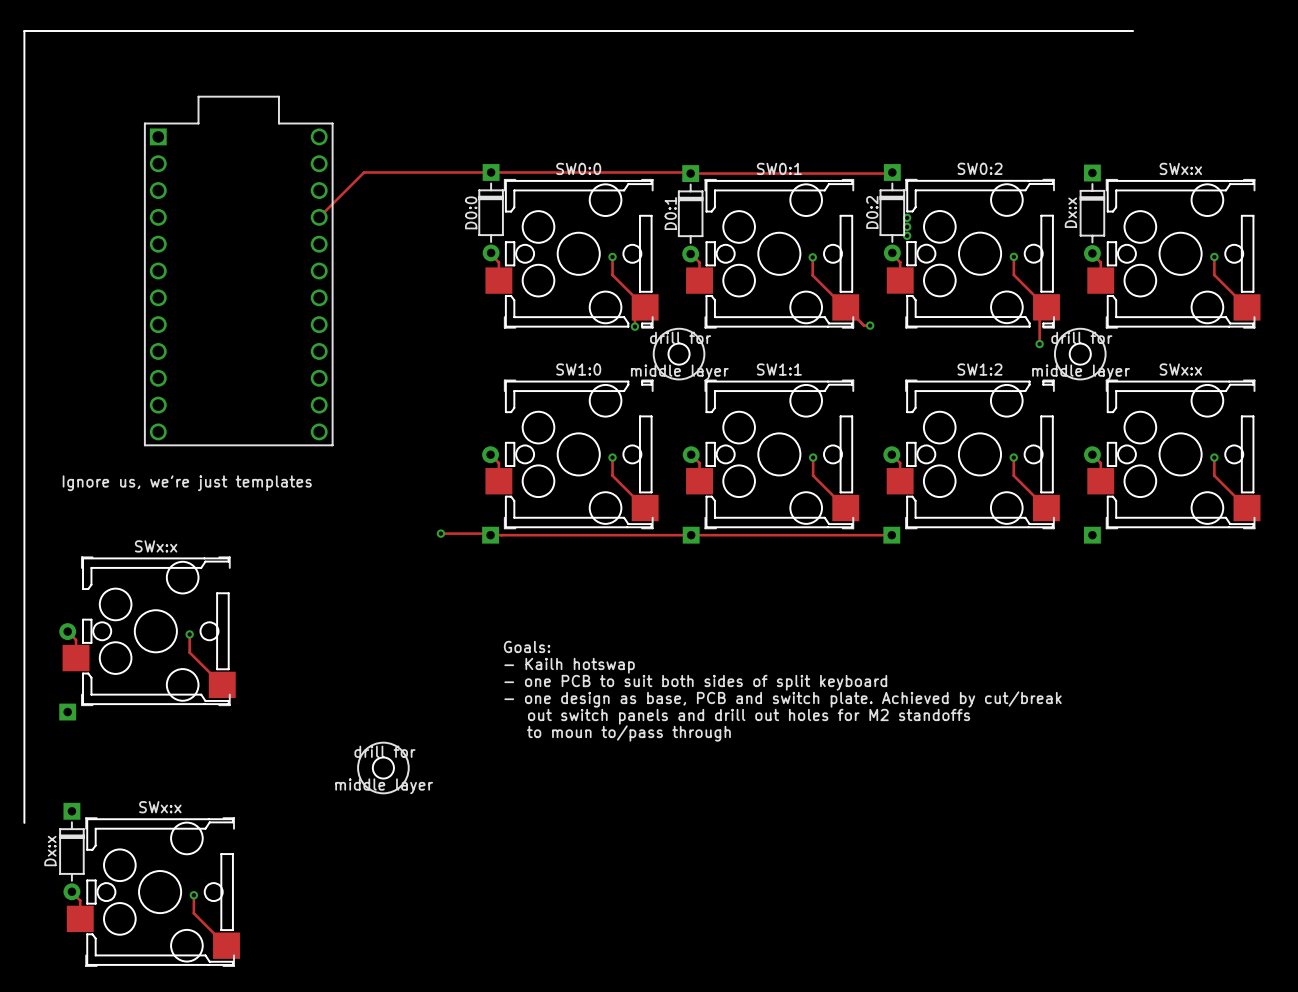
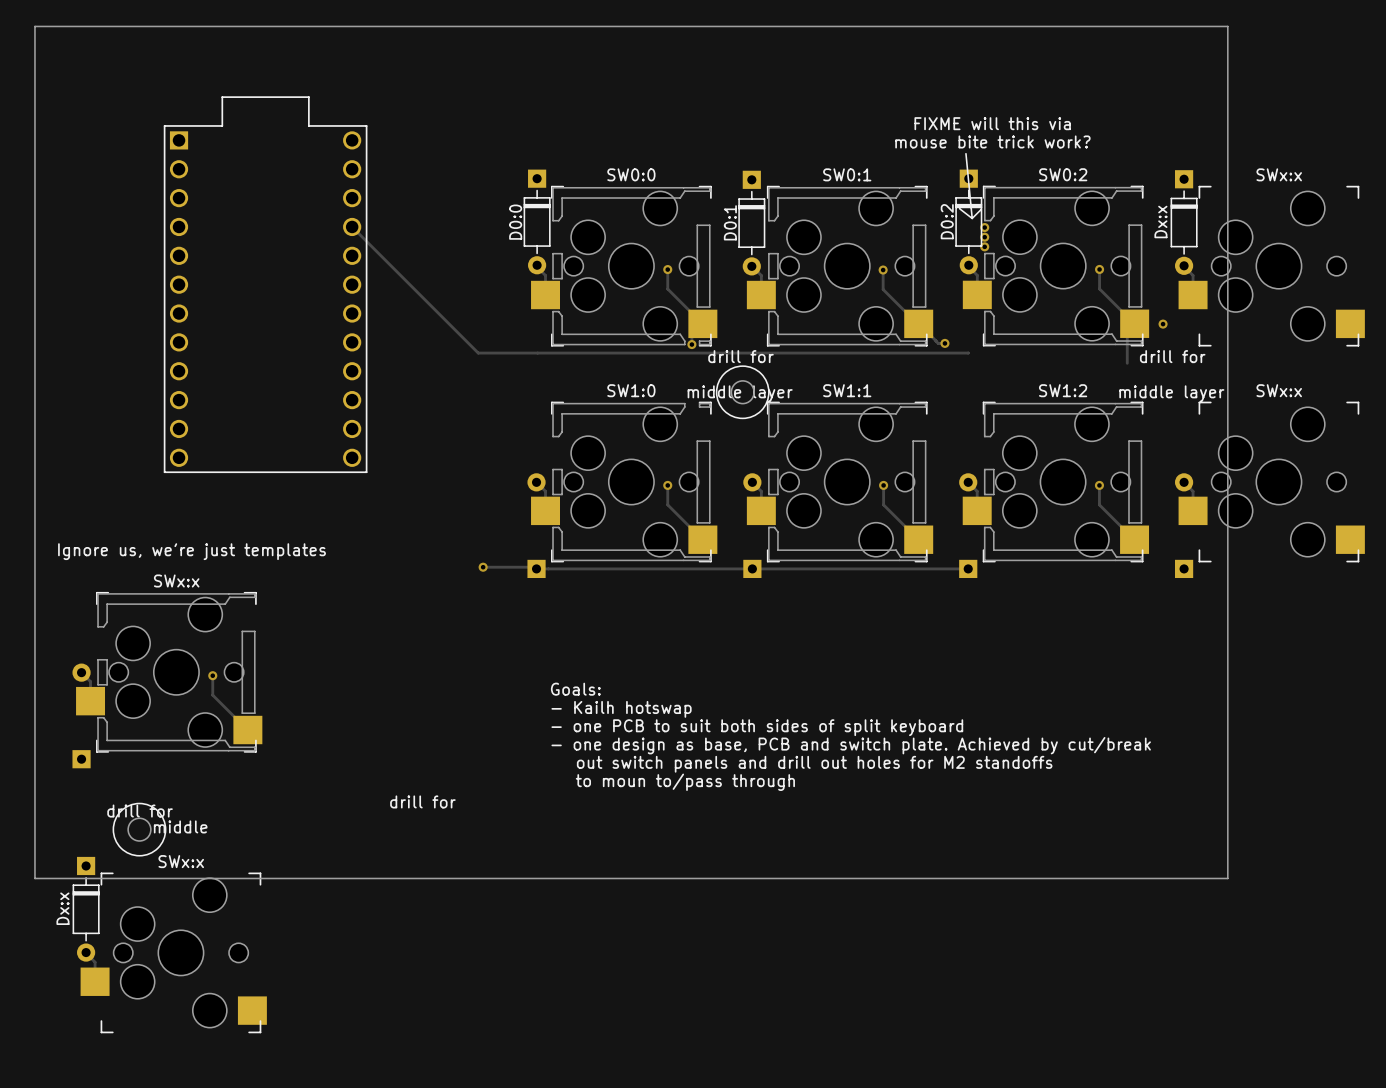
board edge: none -> (1227, 26) (1227, 878) (34, 878)
text: none -> FIXME will this via (992, 123)
text: none -> mouse bite trick work? (992, 141)
line: none -> (965, 153) (972, 218)
track: (892, 172) (364, 172) (319, 217) -> (968, 353) (478, 353) (352, 226)
board edge: (1107, 180) (1107, 211) (1113, 211) (1116, 207) (1116, 190) (1225, 190) (1230, 184) (1253, 184) (1253, 180) (1107, 180) -> none
line: none -> (959, 208) (972, 218)
line: none -> (981, 209) (972, 218)
board edge: (1241, 215) (1253, 215) (1253, 291) (1241, 291) (1241, 215) -> none
board edge: (1107, 242) (1107, 265) (1116, 265) (1116, 242) (1107, 242) -> none
track: (1214, 256) (1214, 275) (1247, 307) -> none
via: (1214, 256) -> none
board edge: (1107, 296) (1107, 326) (1253, 326) (1253, 323) (1230, 323) (1225, 317) (1116, 317) (1116, 300) (1113, 296) (1107, 296) -> none
board edge: (1029, 323) (1029, 326) (907, 326) -> (1141, 344) (984, 344)
board edge: (1052, 323) (1043, 323) (1043, 326) (1052, 326) -> (1141, 341) (1116, 341)
drawing: [653, 328, 706, 381] -> none
drawing: [1054, 328, 1107, 381] -> none
round board edge: [1069, 343, 1092, 365] -> none
via position: (1039, 344) -> (1163, 324)
drawing: none -> [715, 365, 770, 420]
round board edge position: (679, 354) -> (742, 392)
board edge: (1029, 381) (1029, 384) -> (1116, 403) (1131, 403)
board edge: (1043, 381) (1043, 384) -> (1116, 407) (1131, 407)
board edge: (1107, 381) (1253, 381) (1253, 384) (1230, 384) (1225, 391) (1116, 391) (1116, 407) (1113, 412) (1107, 412) (1107, 381) -> none
board edge: (1241, 416) (1241, 492) (1253, 492) (1253, 416) (1241, 416) -> none
board edge: (1107, 442) (1107, 466) (1116, 466) (1116, 442) (1107, 442) -> none
track: (1214, 457) (1214, 475) (1247, 508) -> none
via: (1214, 457) -> none
text position: Ignore us, we're just templates (187, 483) -> Ignore us, we're just templates (192, 551)
board edge: (1107, 496) (1107, 527) (1253, 527) (1253, 524) (1230, 524) (1225, 517) (1116, 517) (1116, 500) (1113, 496) (1107, 496) -> none
drawing: [357, 742, 410, 794] -> none
drawing: none -> [112, 802, 167, 857]
round board edge: [372, 757, 395, 779] -> none
text: none -> drill for (140, 811)
round board edge: none -> [127, 817, 152, 842]
text: none -> middle (180, 826)
text: middle layer (384, 786) -> none
board edge: (87, 819) (87, 849) (92, 849) (95, 845) (95, 828) (205, 828) (209, 822) (232, 822) (232, 819) (87, 819) -> none
board edge: (221, 854) (232, 854) (232, 930) (221, 930) (221, 854) -> none
board edge: (87, 880) (87, 903) (95, 903) (95, 880) (87, 880) -> none
track: (193, 895) (193, 913) (226, 945) -> none
via: (193, 895) -> none
board edge: (87, 934) (87, 964) (232, 964) (232, 961) (209, 961) (205, 955) (95, 955) (95, 938) (92, 934) (87, 934) -> none

